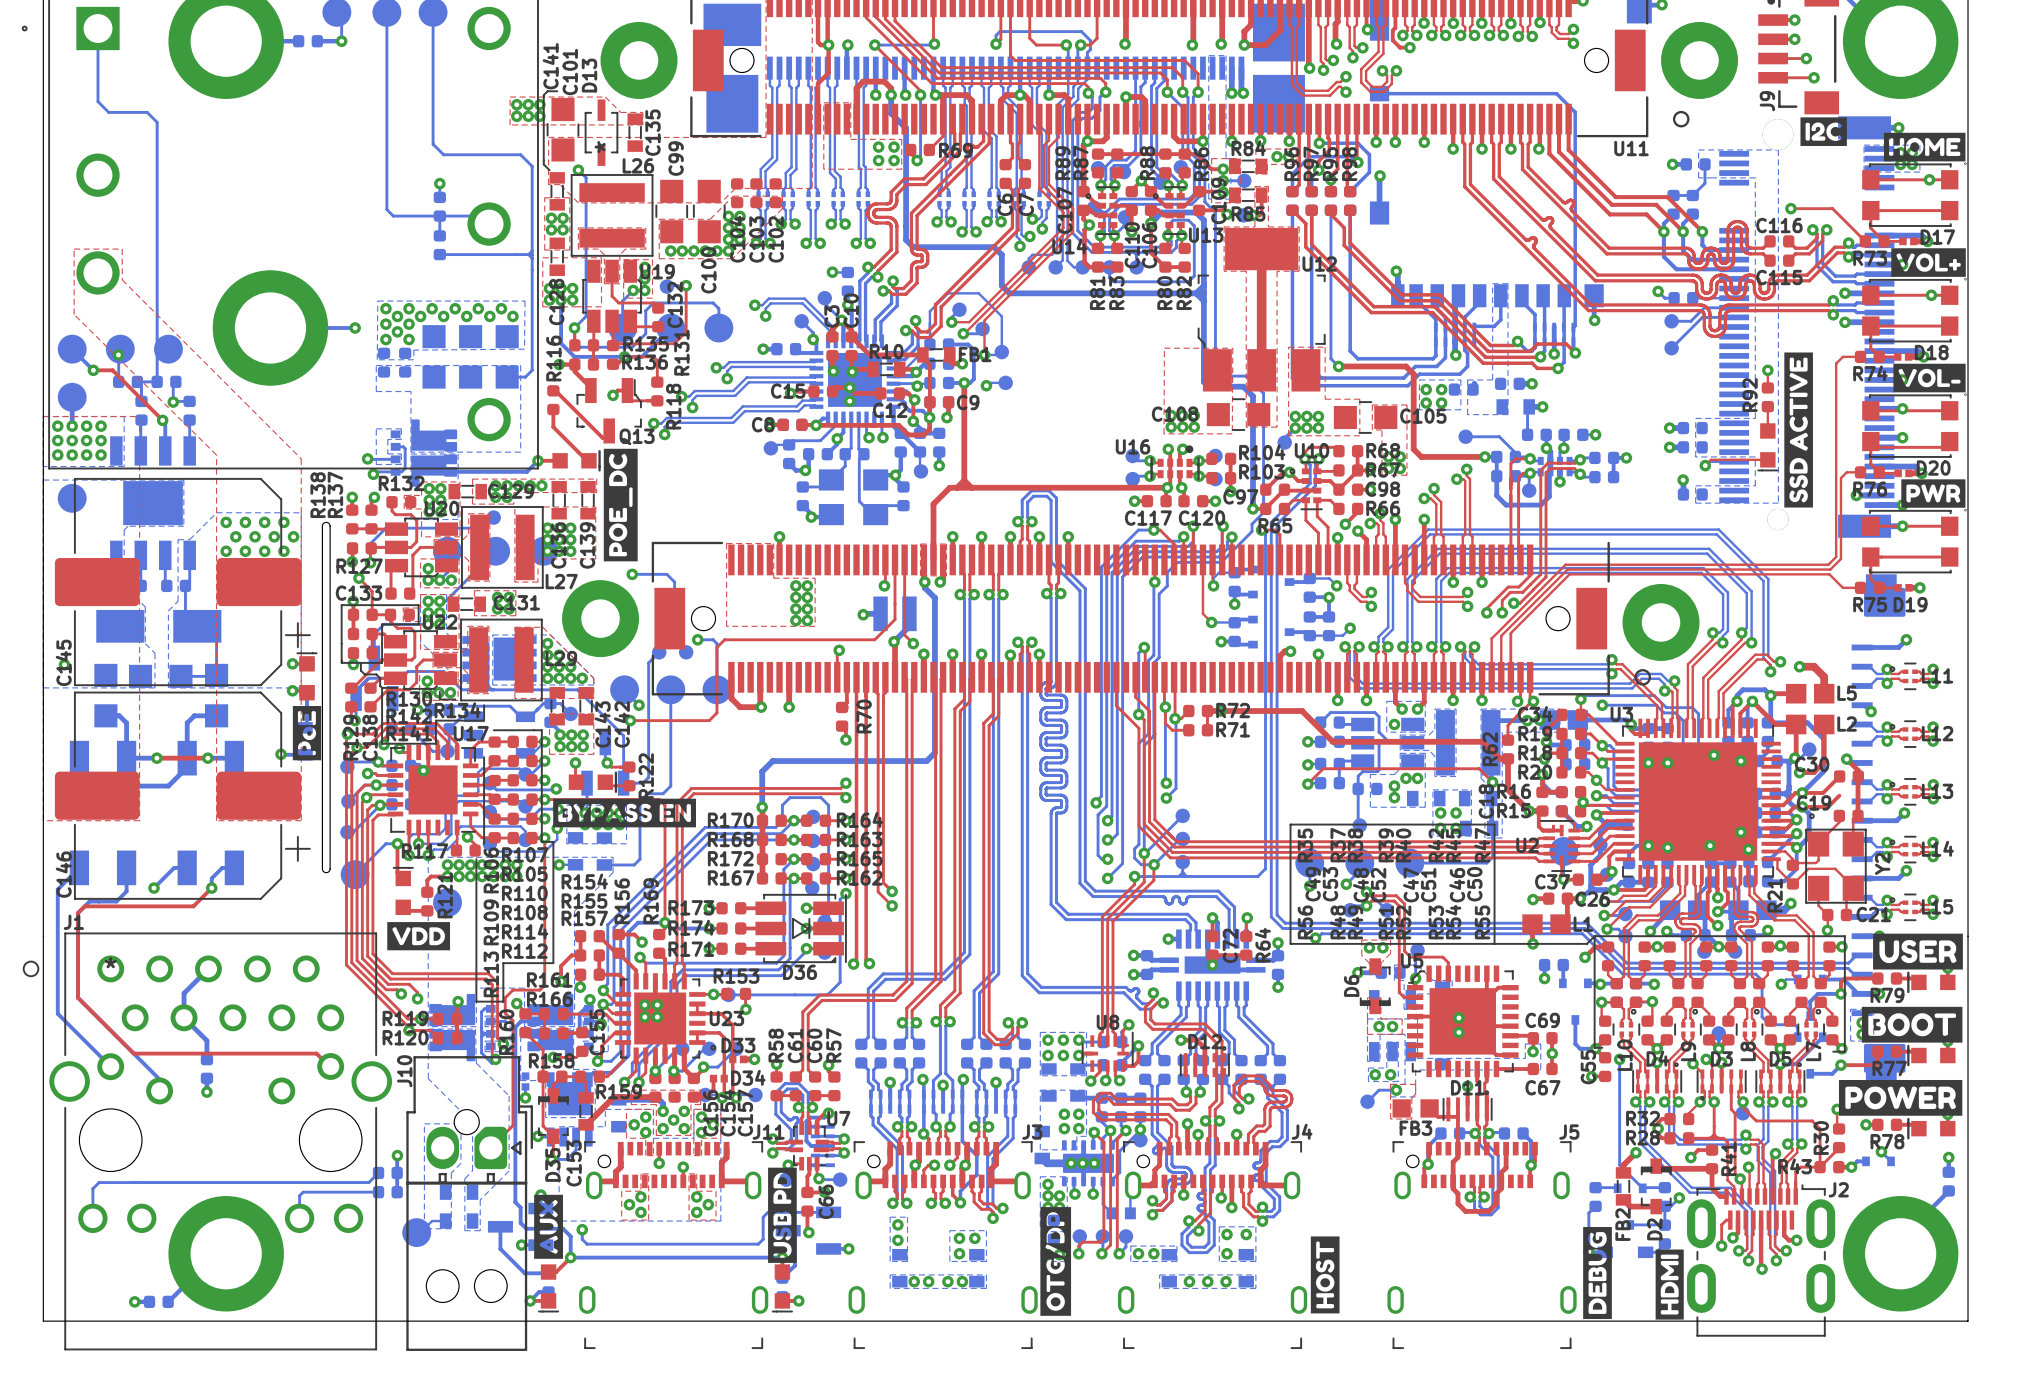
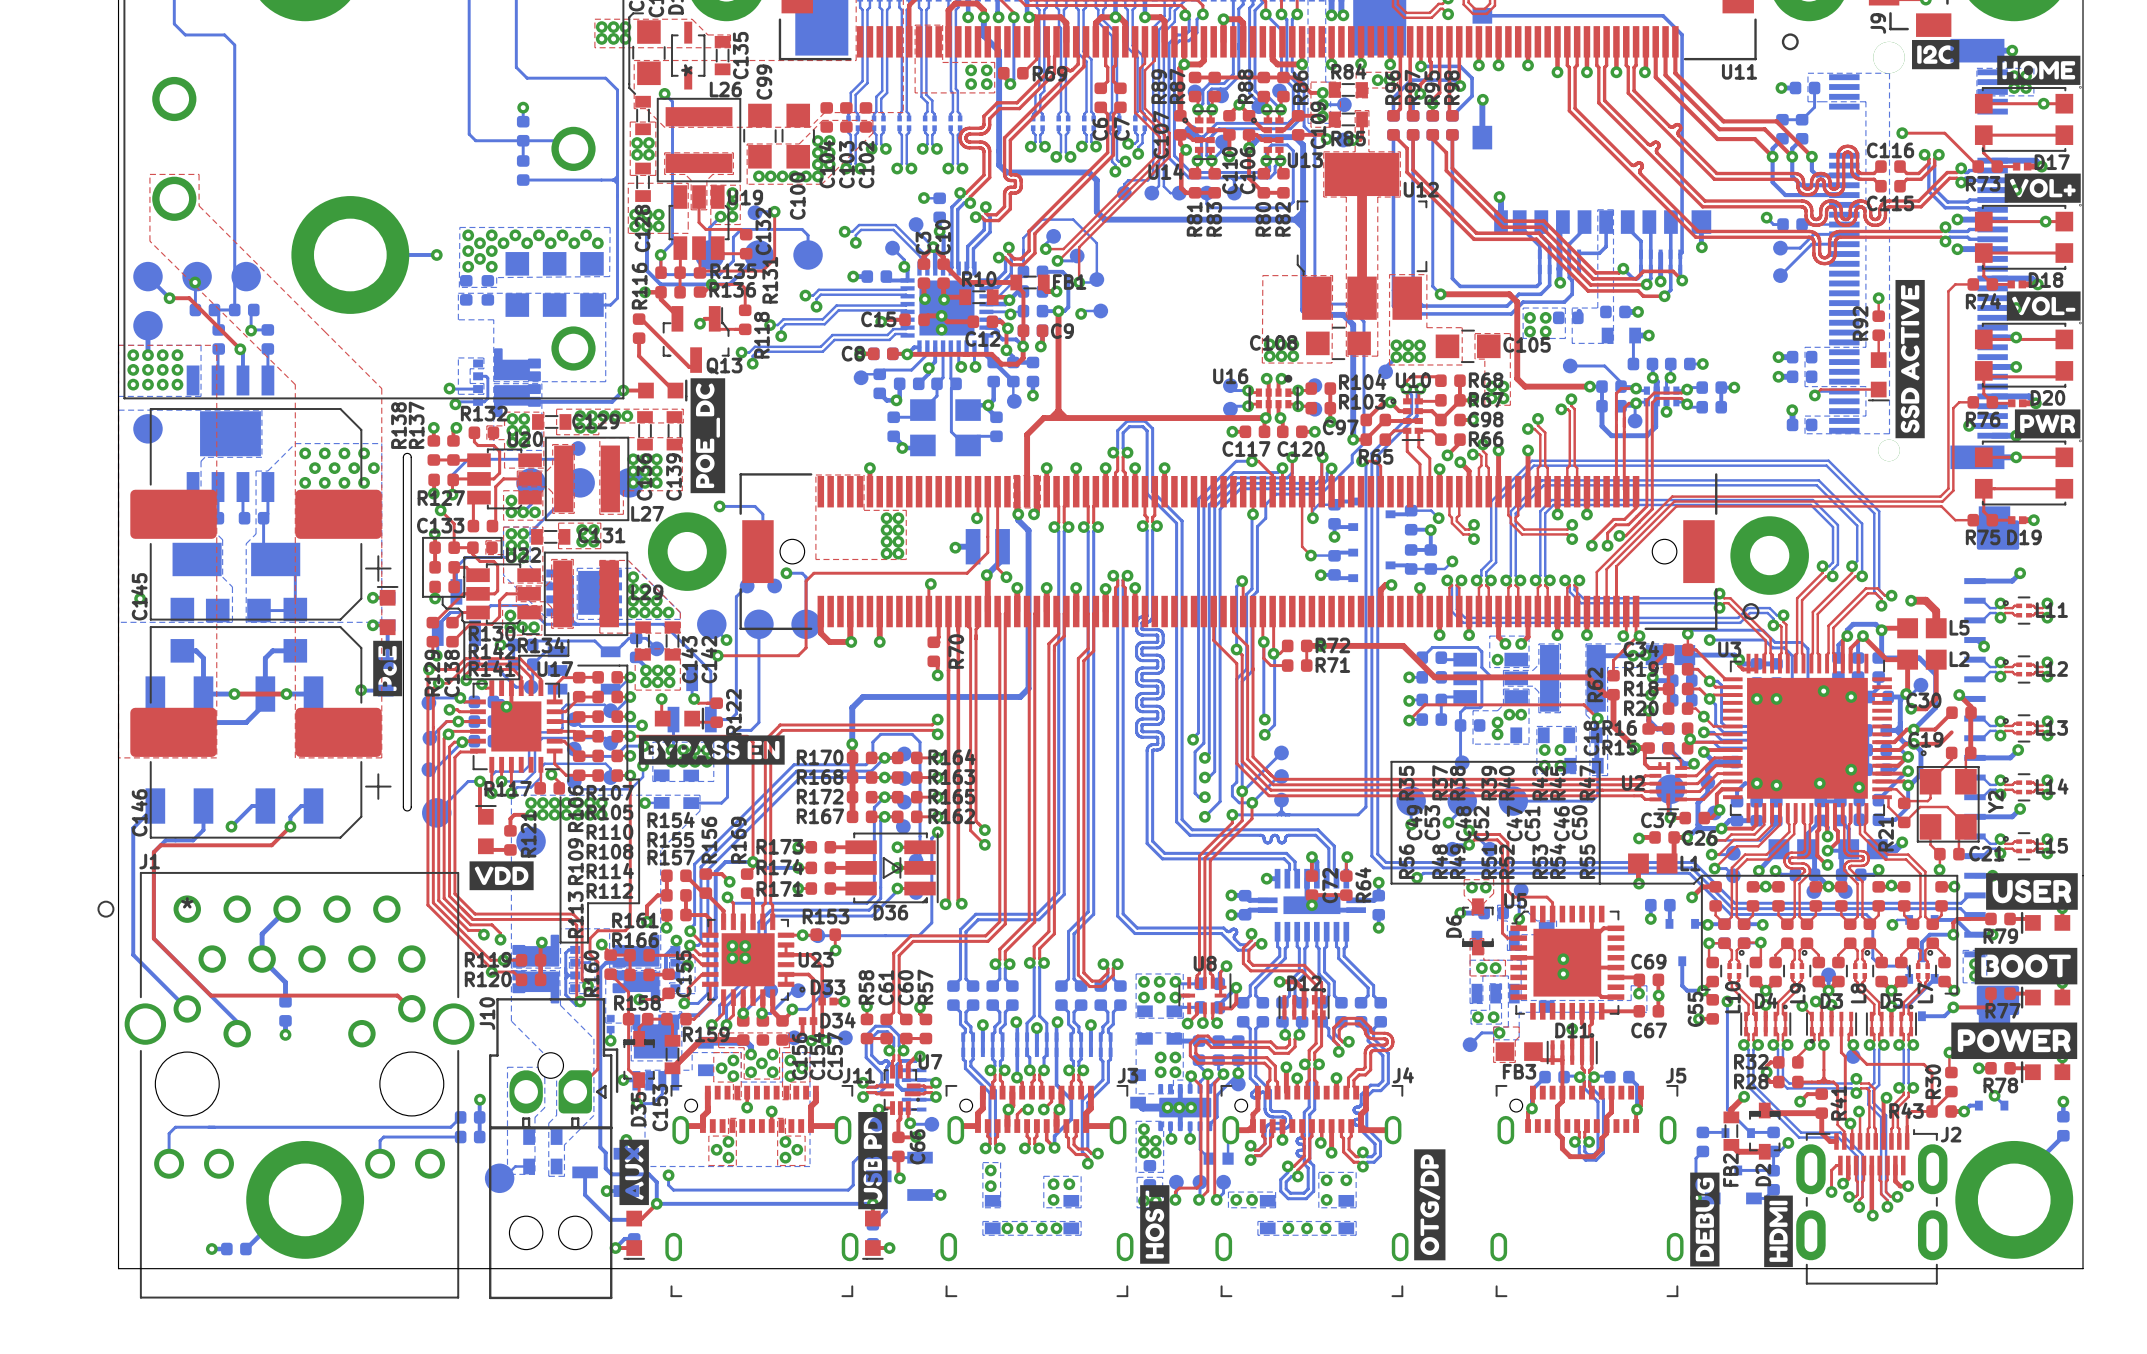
drawing position: (1055, 1261) -> (1429, 1204)
drawing position: (1325, 1274) -> (1154, 1224)

